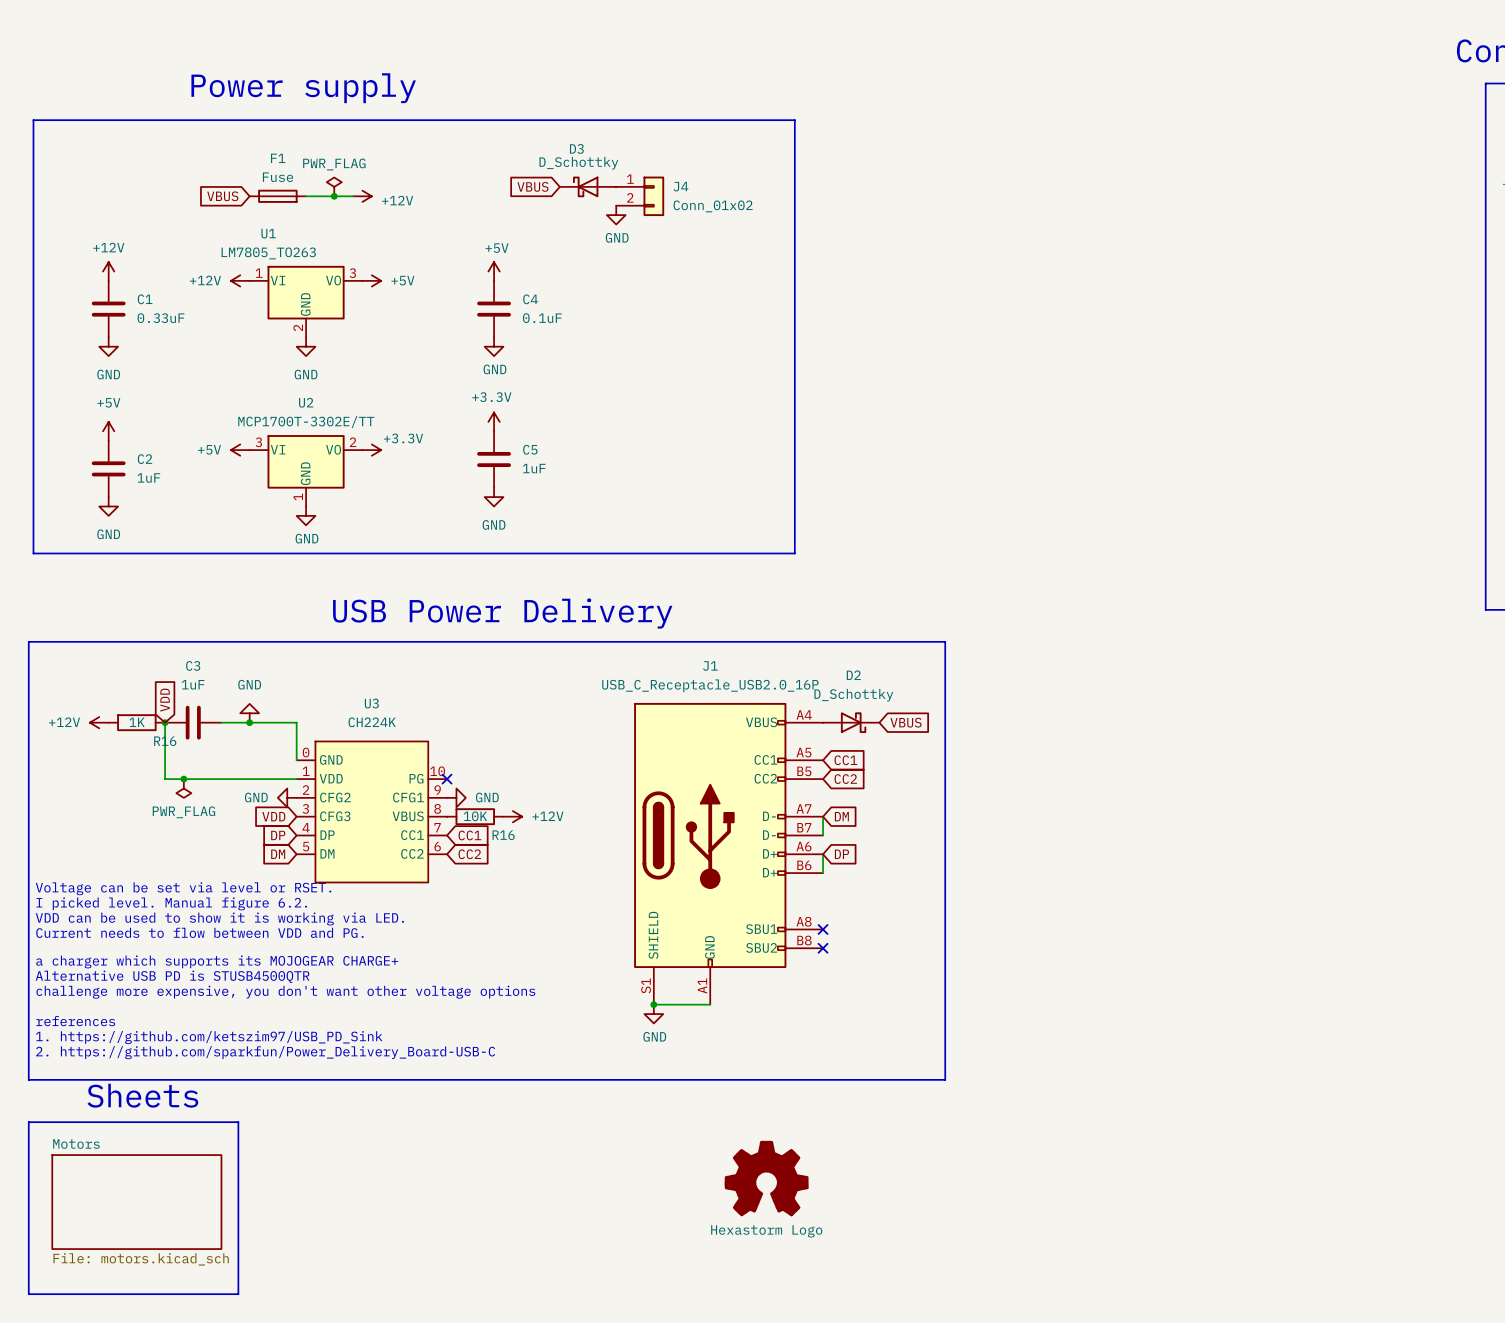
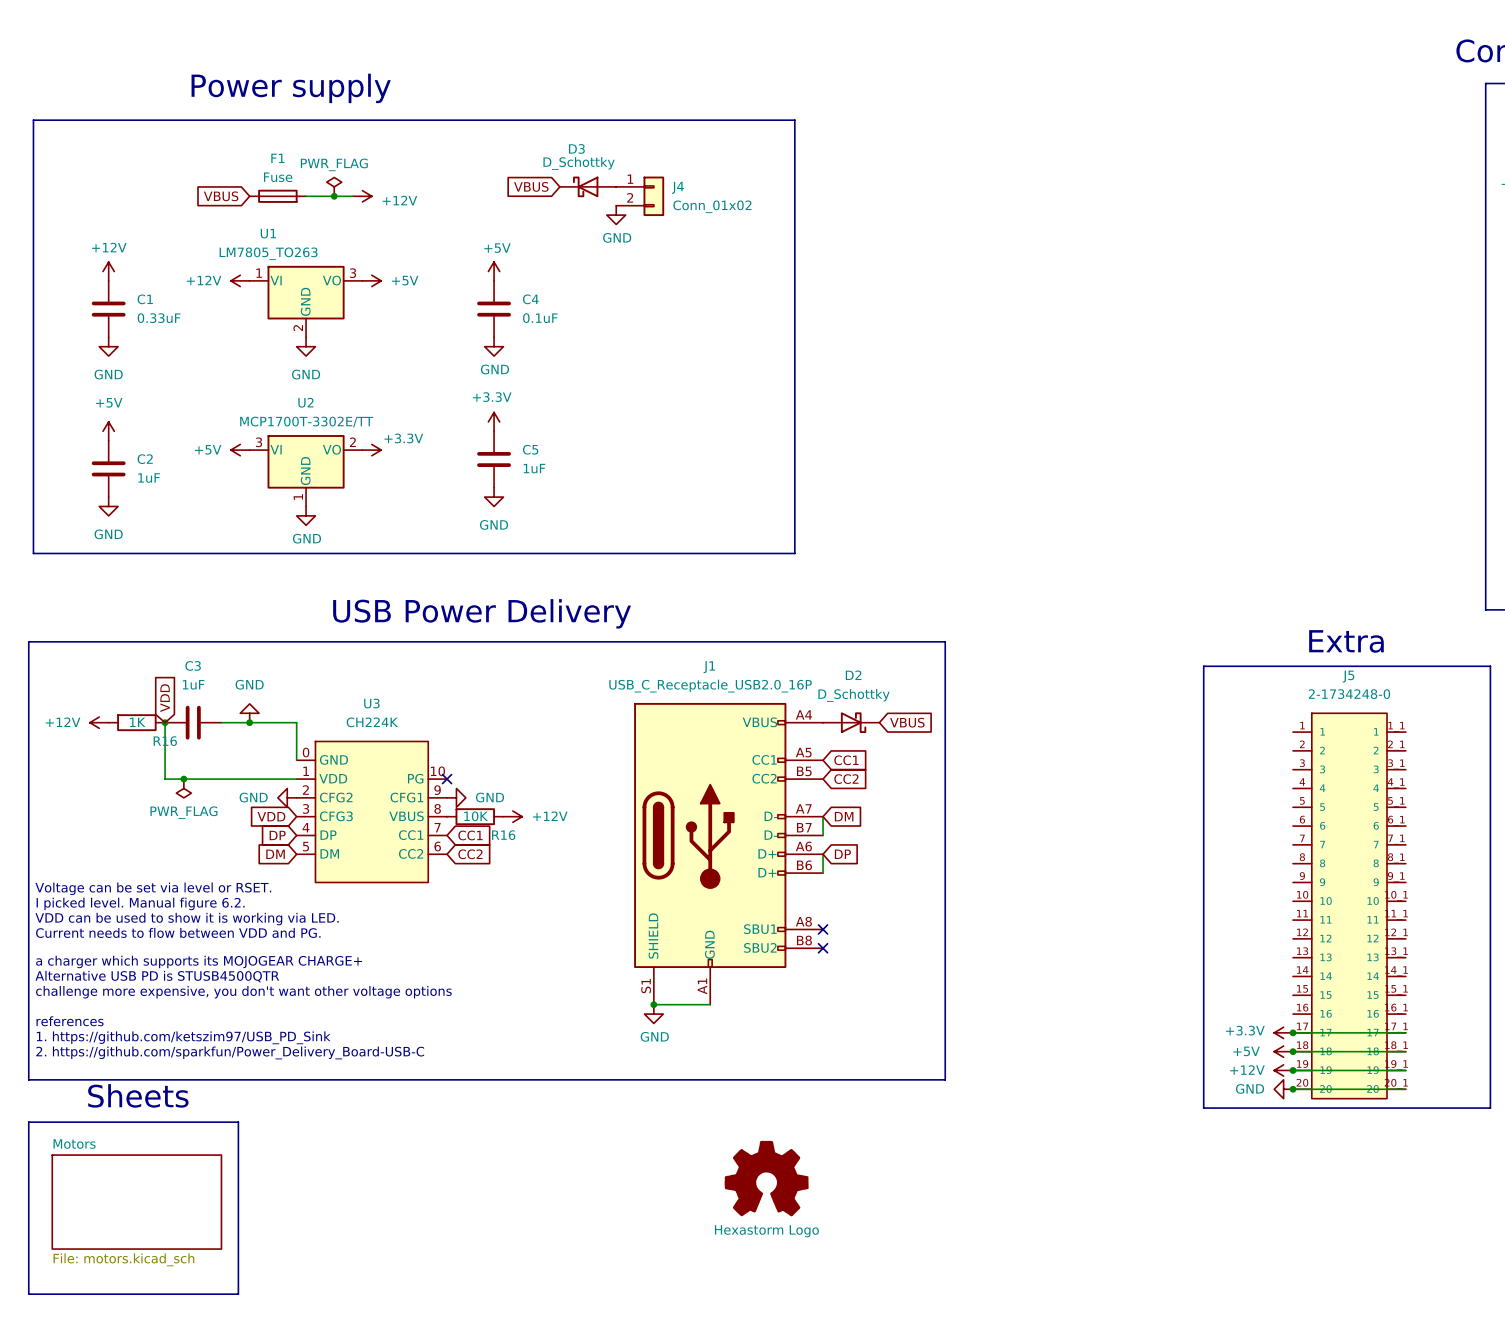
text: none -> Extra (1346, 641)
line: none -> (1203, 666) (1490, 666) (1490, 1108) (1203, 1108) (1203, 666)
J5: none -> 2-1734248-0 (1349, 905)
power symbol: none -> +3.3V (1283, 1032)
wire: none -> (1293, 1032) (1405, 1032)
junction: none -> (1293, 1032)
power symbol: none -> +5V (1283, 1051)
wire: none -> (1293, 1051) (1405, 1051)
junction: none -> (1293, 1051)
power symbol: none -> +12V (1283, 1070)
wire: none -> (1293, 1070) (1405, 1070)
junction: none -> (1293, 1070)
power symbol: none -> GND (1283, 1089)
wire: none -> (1293, 1089) (1405, 1089)
junction: none -> (1293, 1089)

